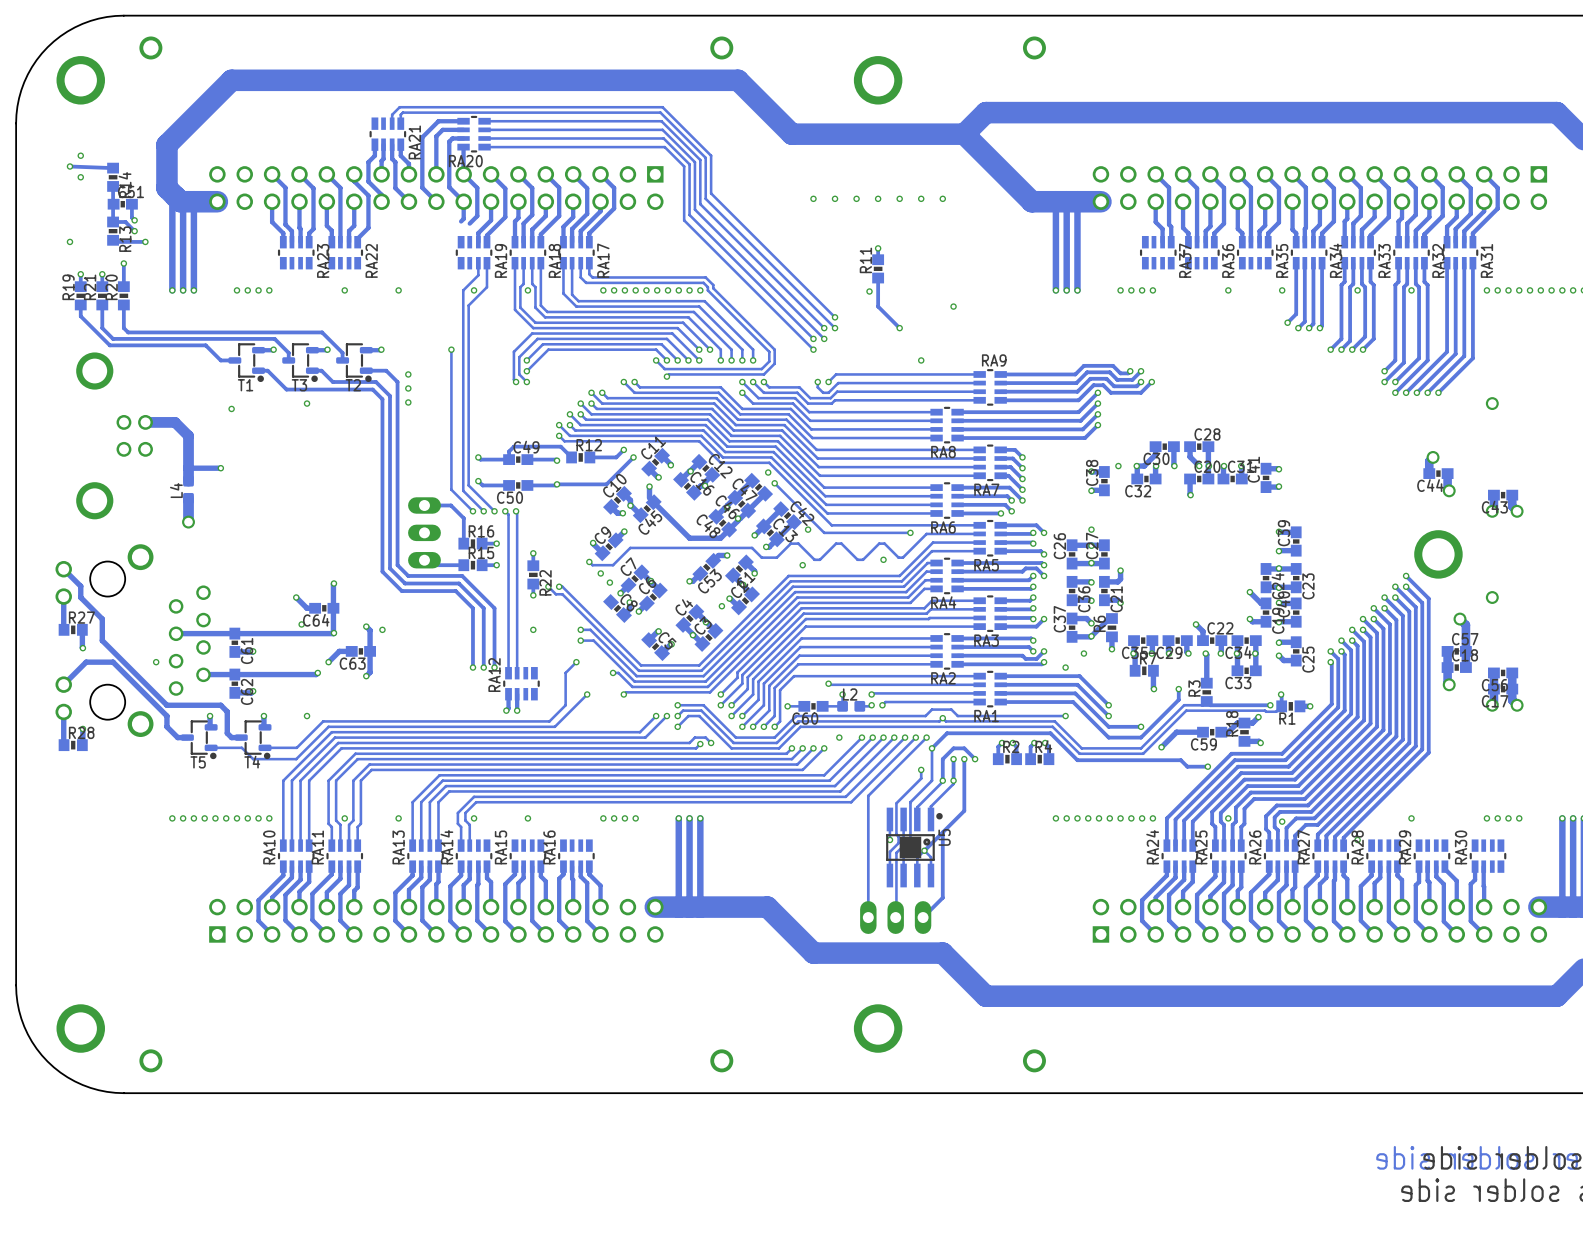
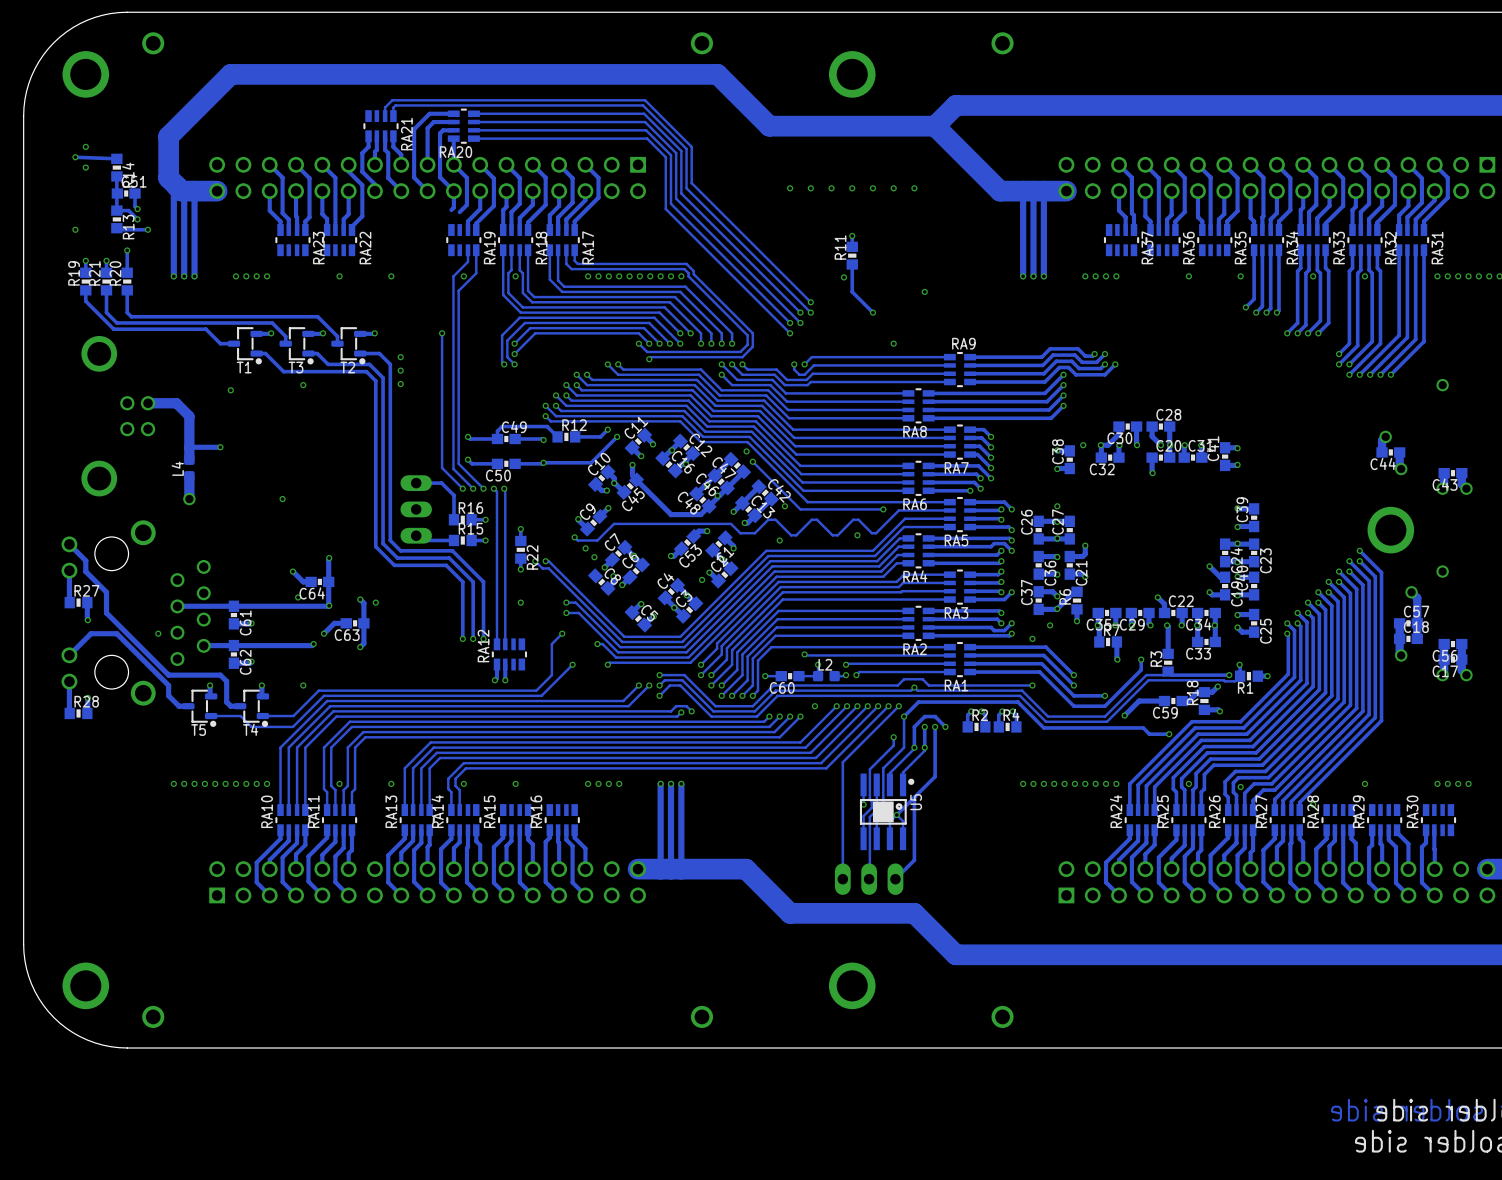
via: none -> (282, 499)

